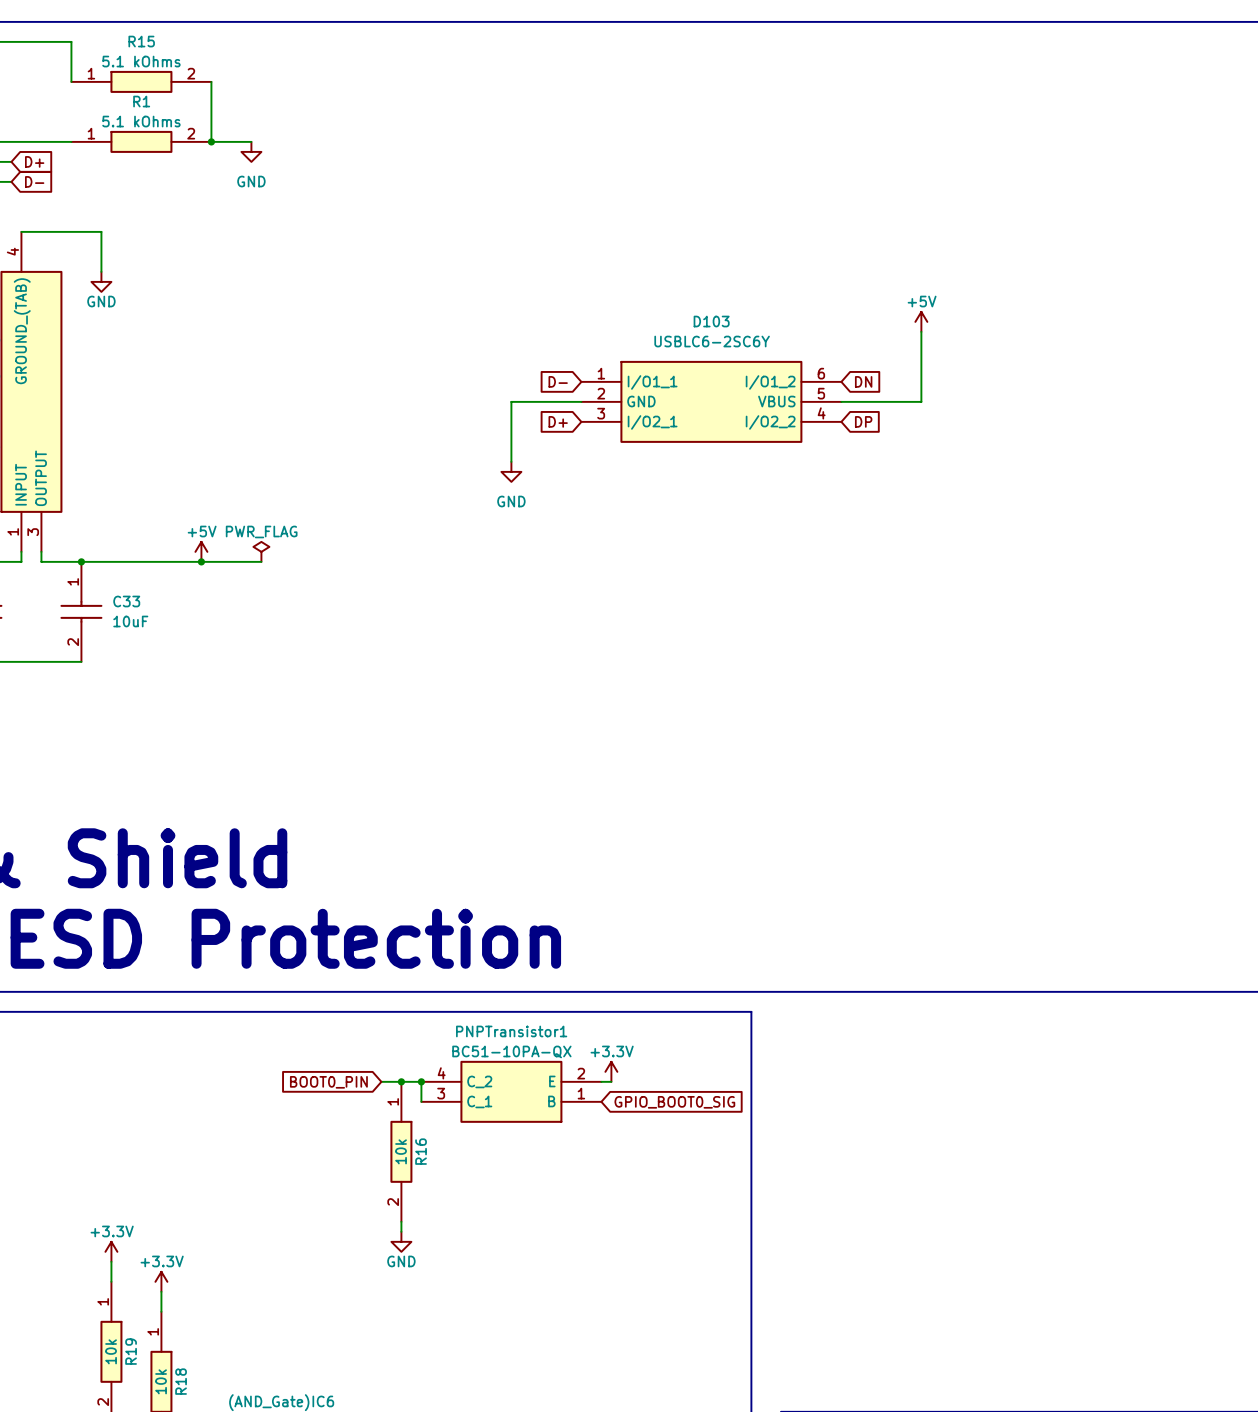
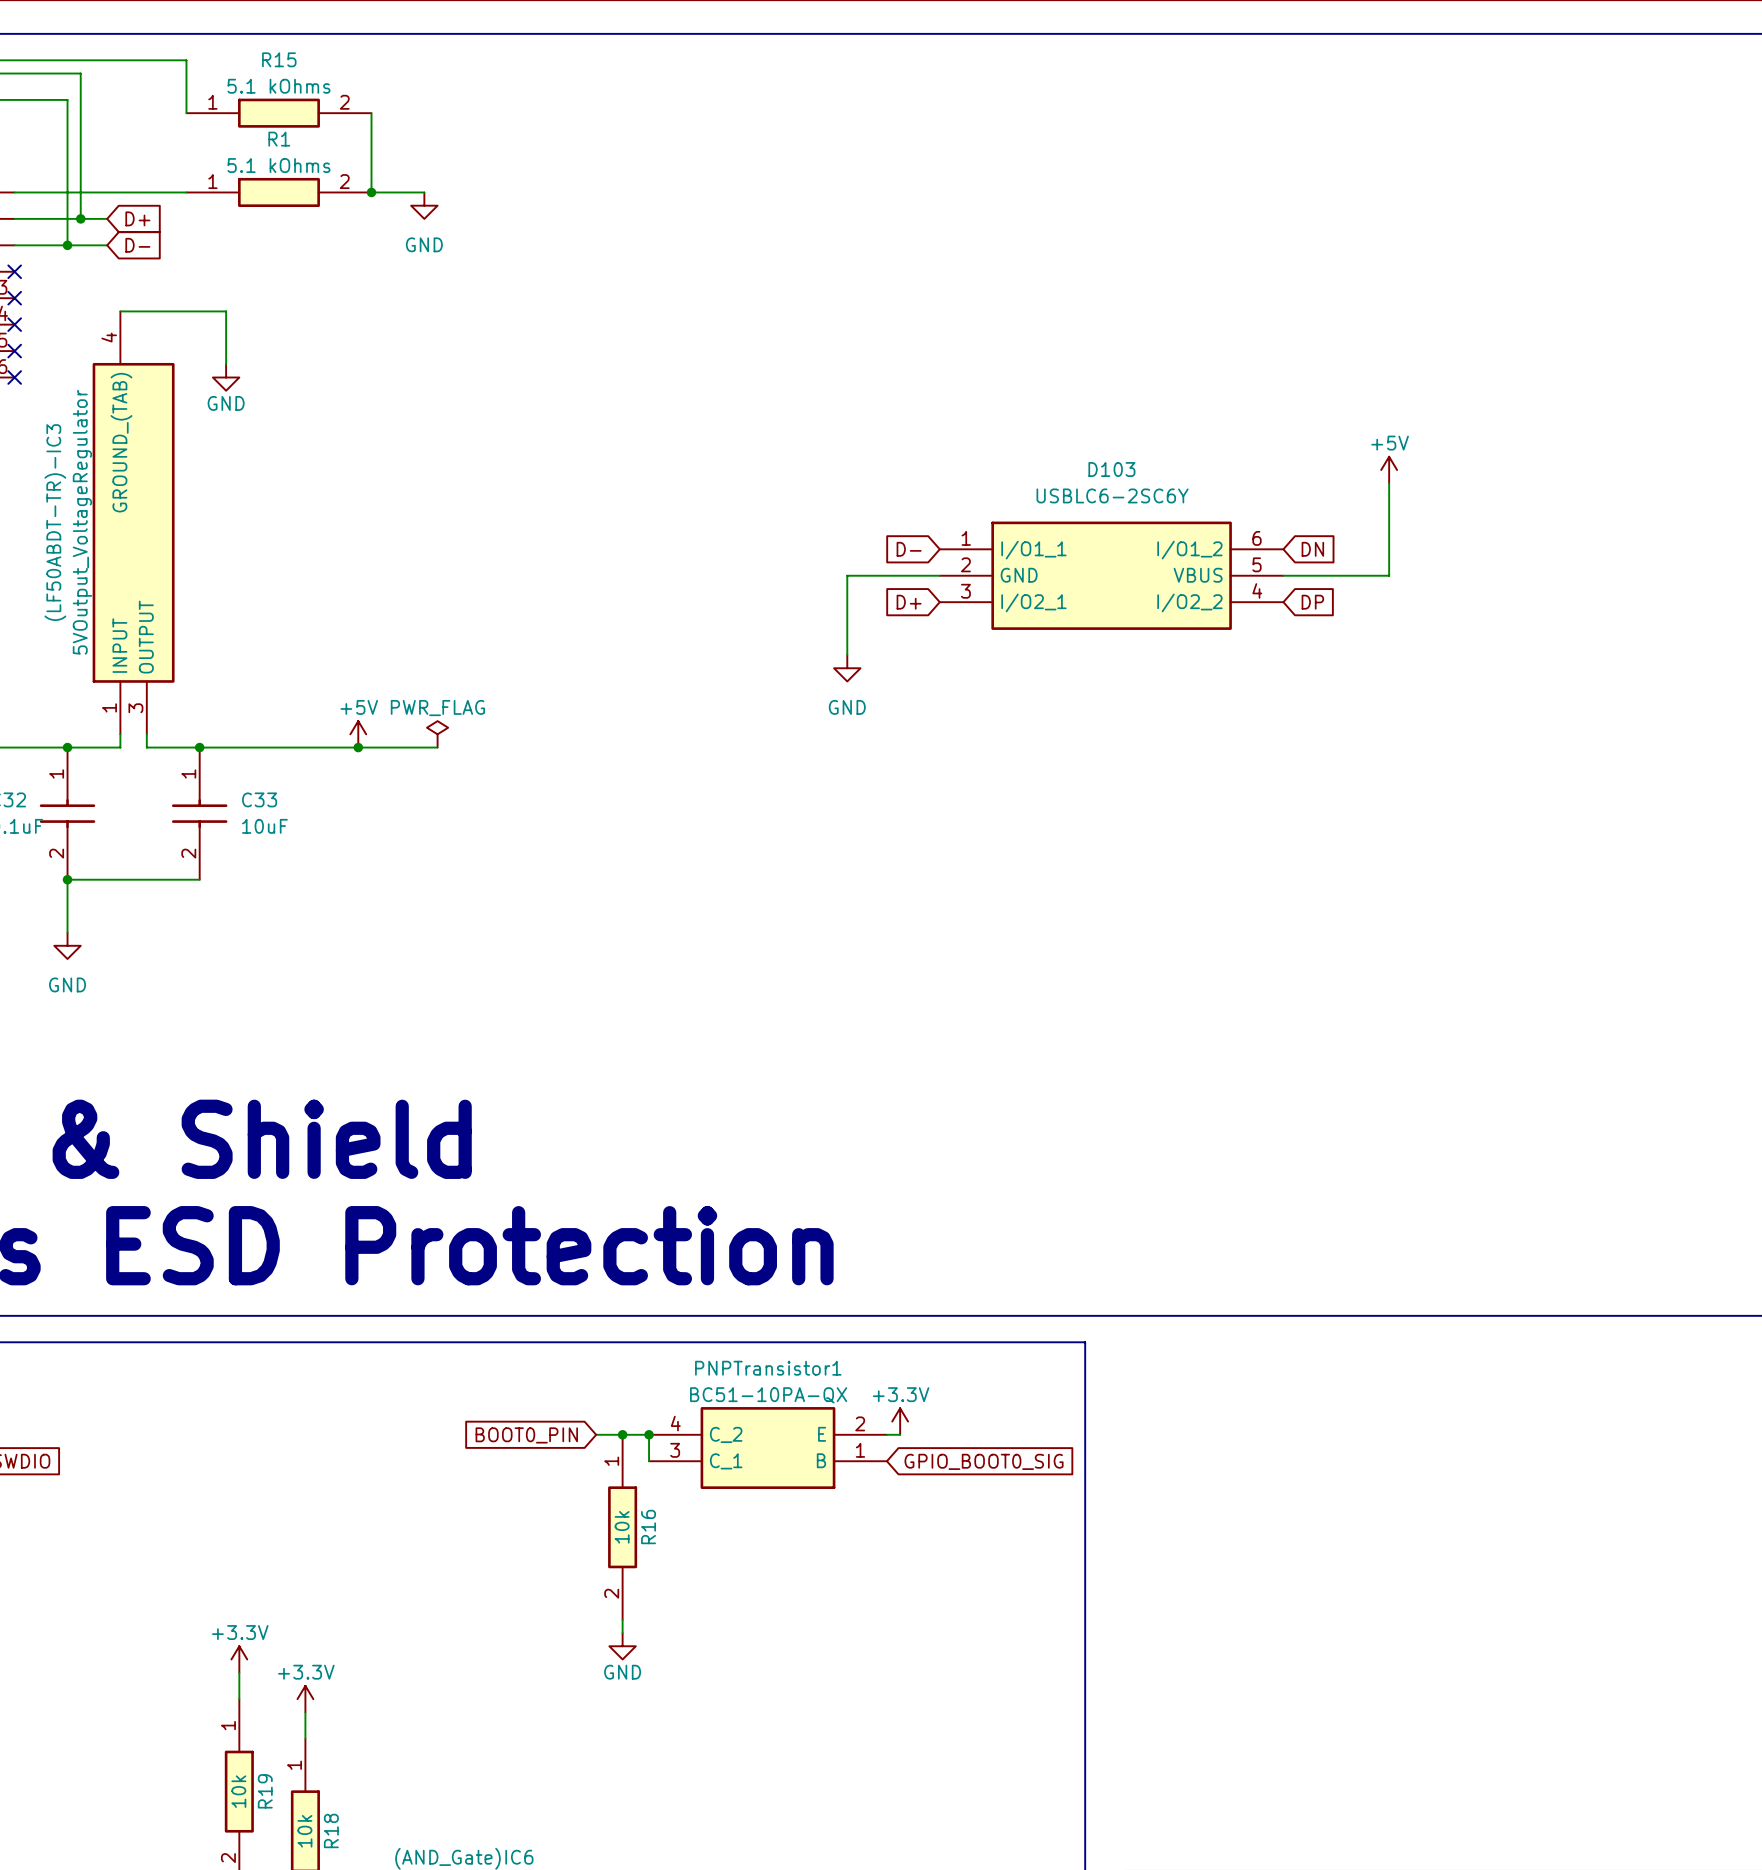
power symbol position: +5V (921, 321) -> +5V (1389, 470)
wire: (921, 331) (921, 401) (841, 401) -> (1389, 483) (1389, 575) (1283, 575)
global label position: D- (558, 381) -> D- (909, 549)
global label position: DN (863, 381) -> DN (1312, 549)
wire: (581, 401) (511, 401) (511, 461) -> (939, 575) (847, 575) (847, 655)
D103 position: (711, 401) -> (1111, 575)
global label position: D+ (558, 421) -> D+ (909, 602)
global label position: DP (863, 421) -> DP (1312, 602)
power symbol position: GND (511, 471) -> GND (847, 668)

